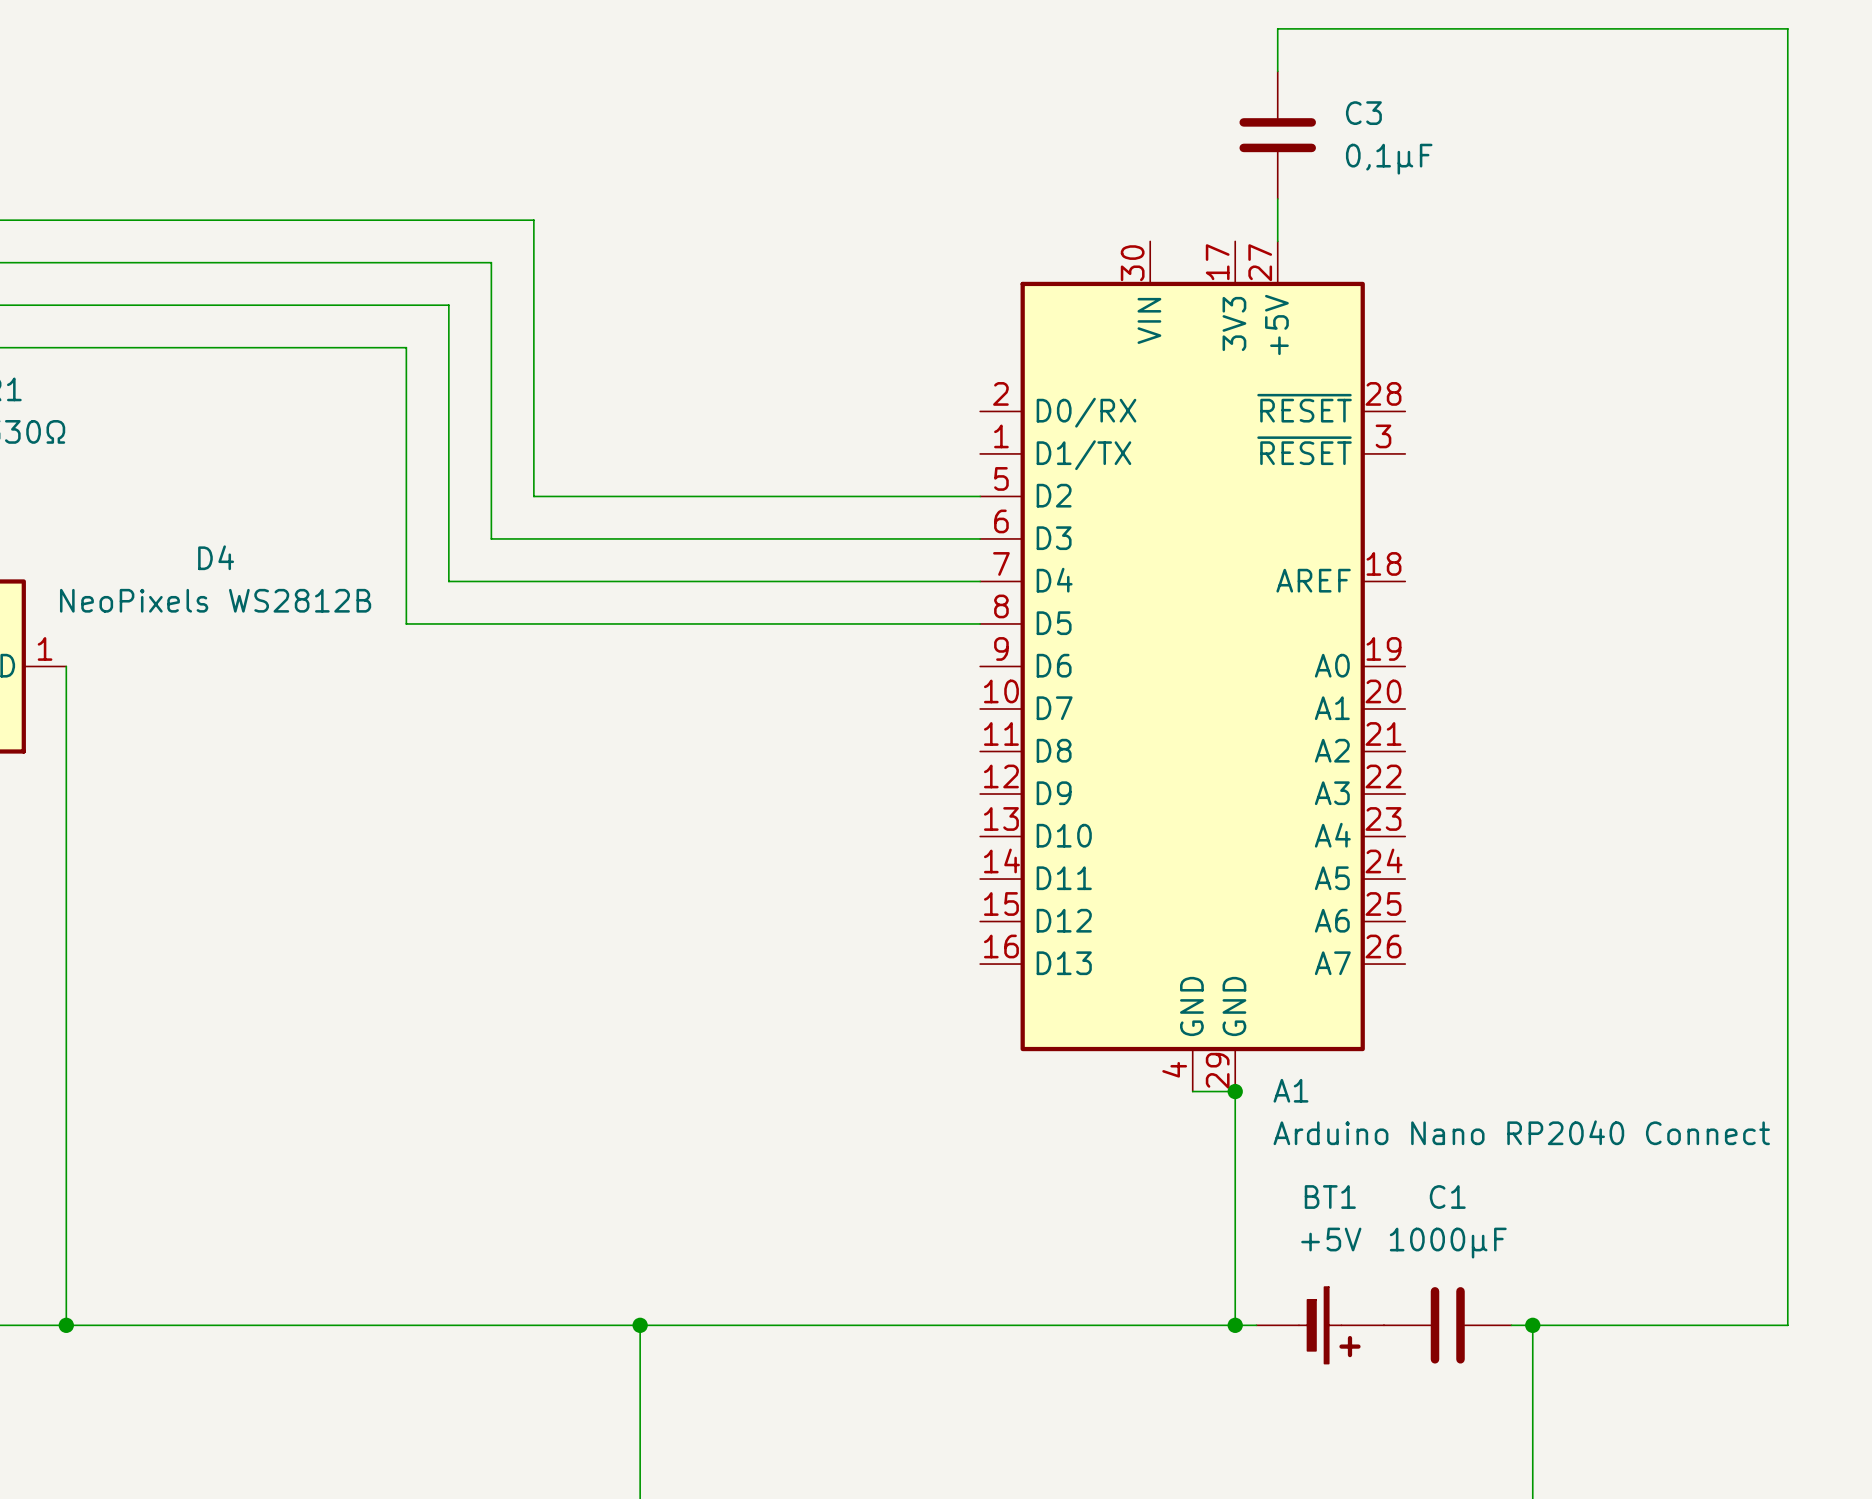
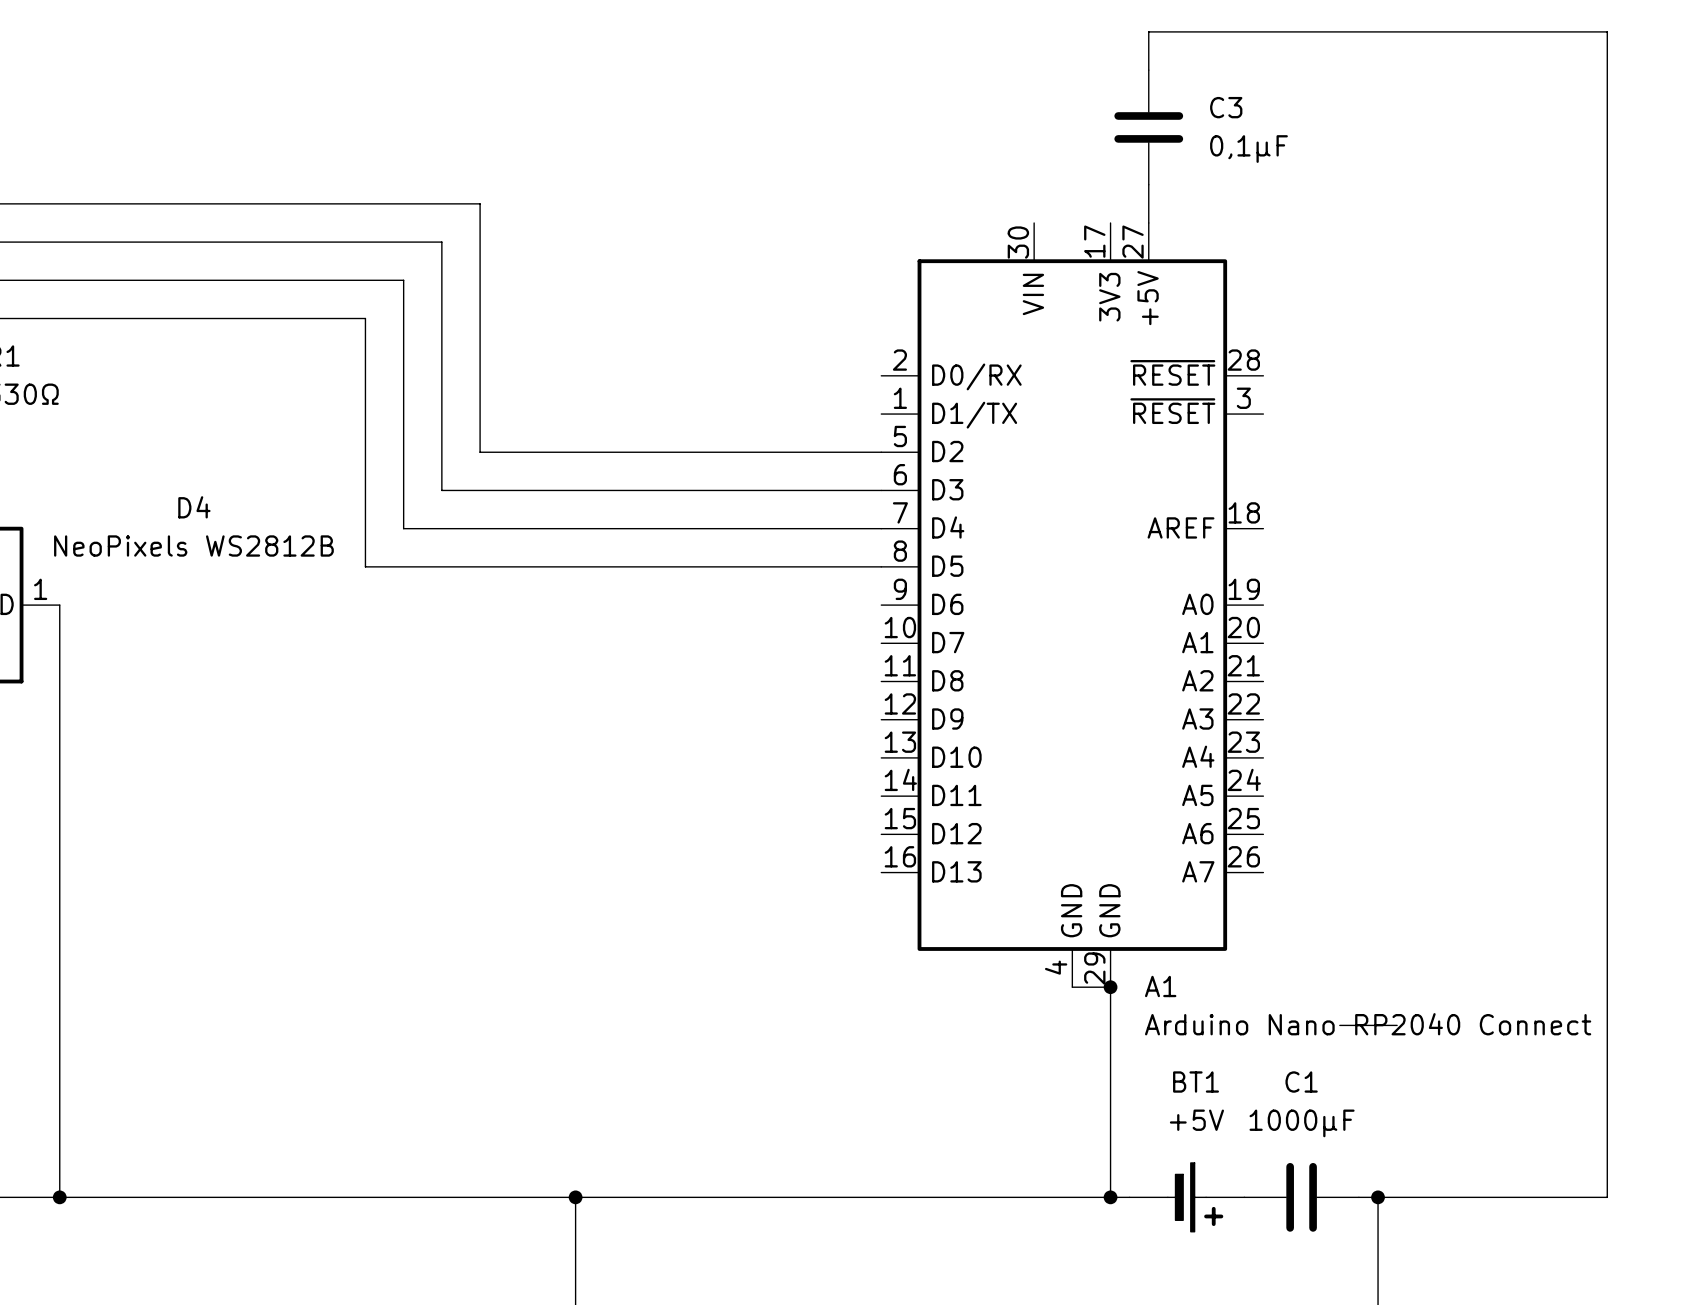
wire: none -> (1339, 1025) (1397, 1025)

